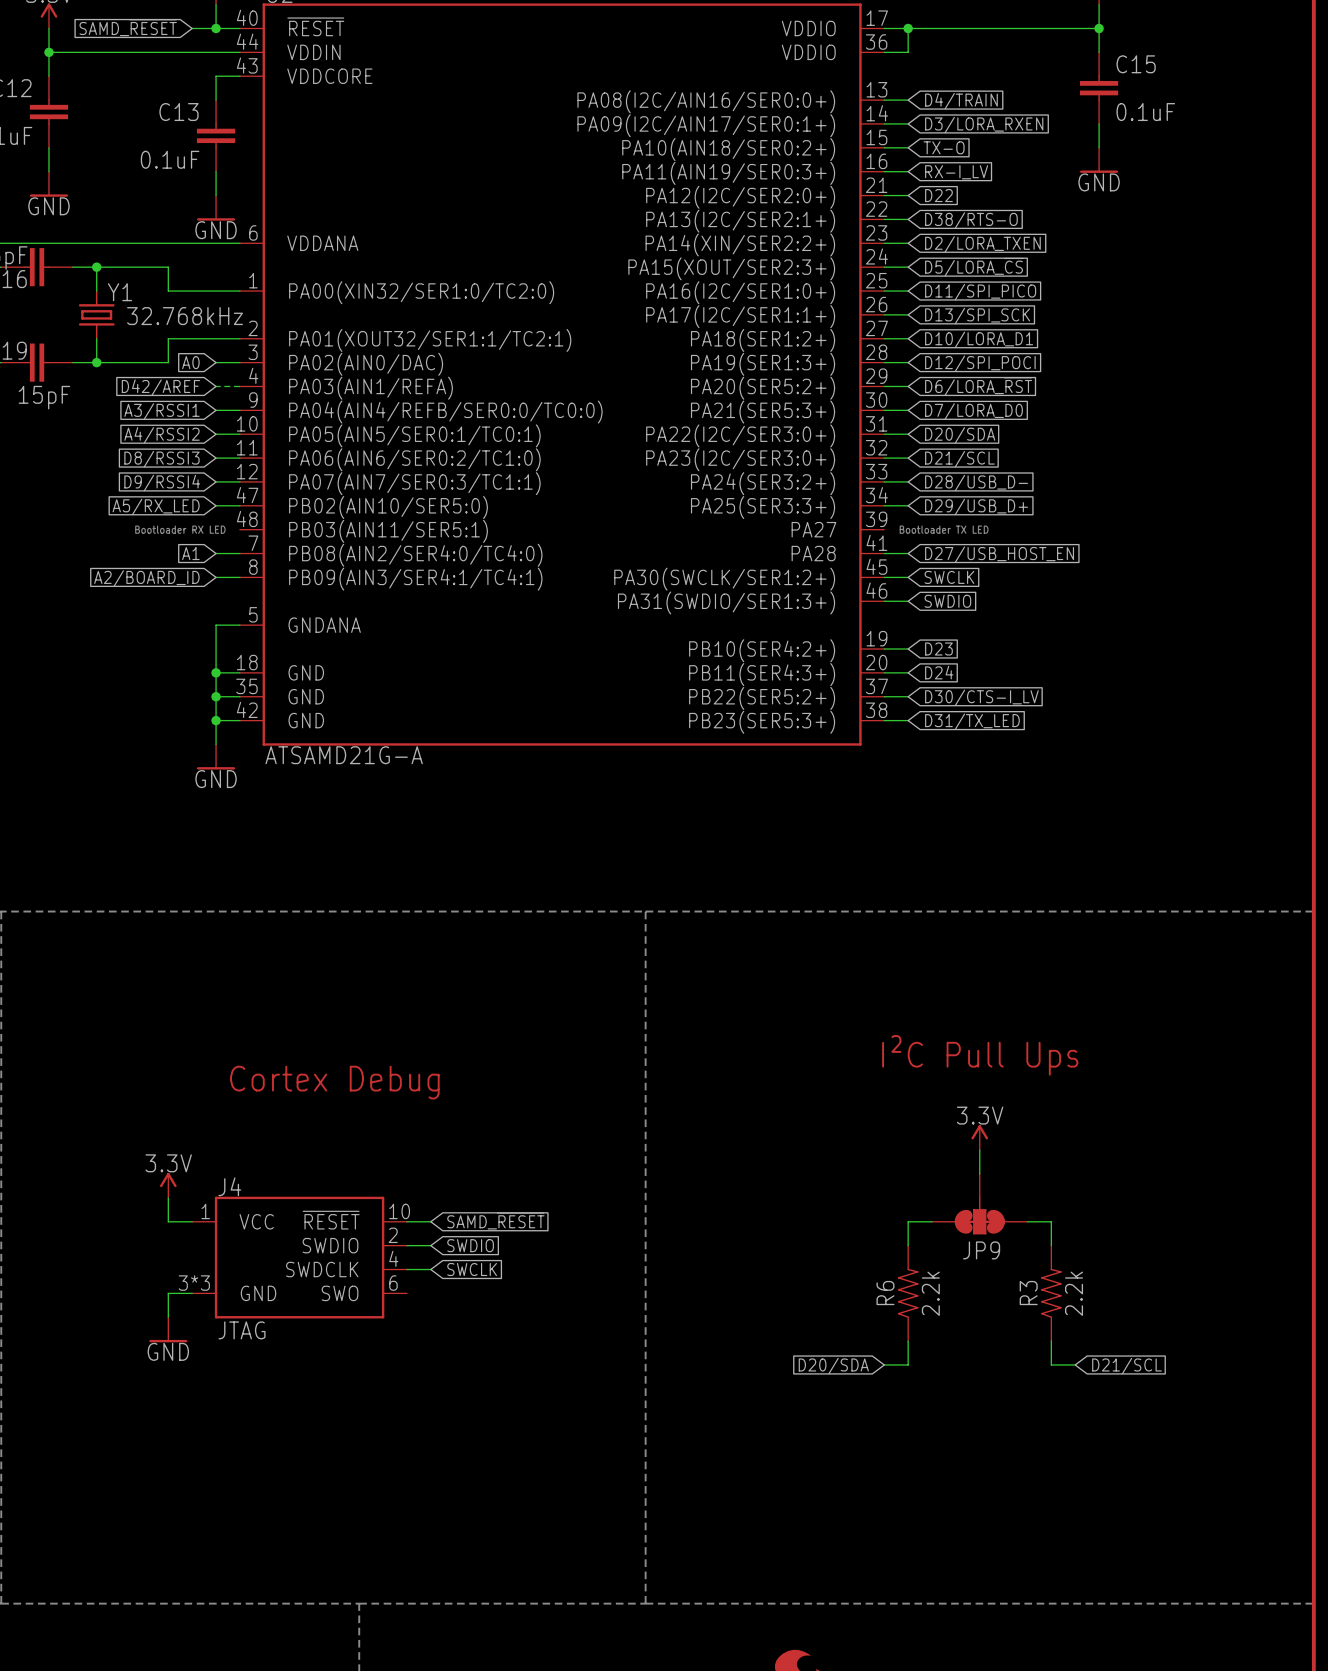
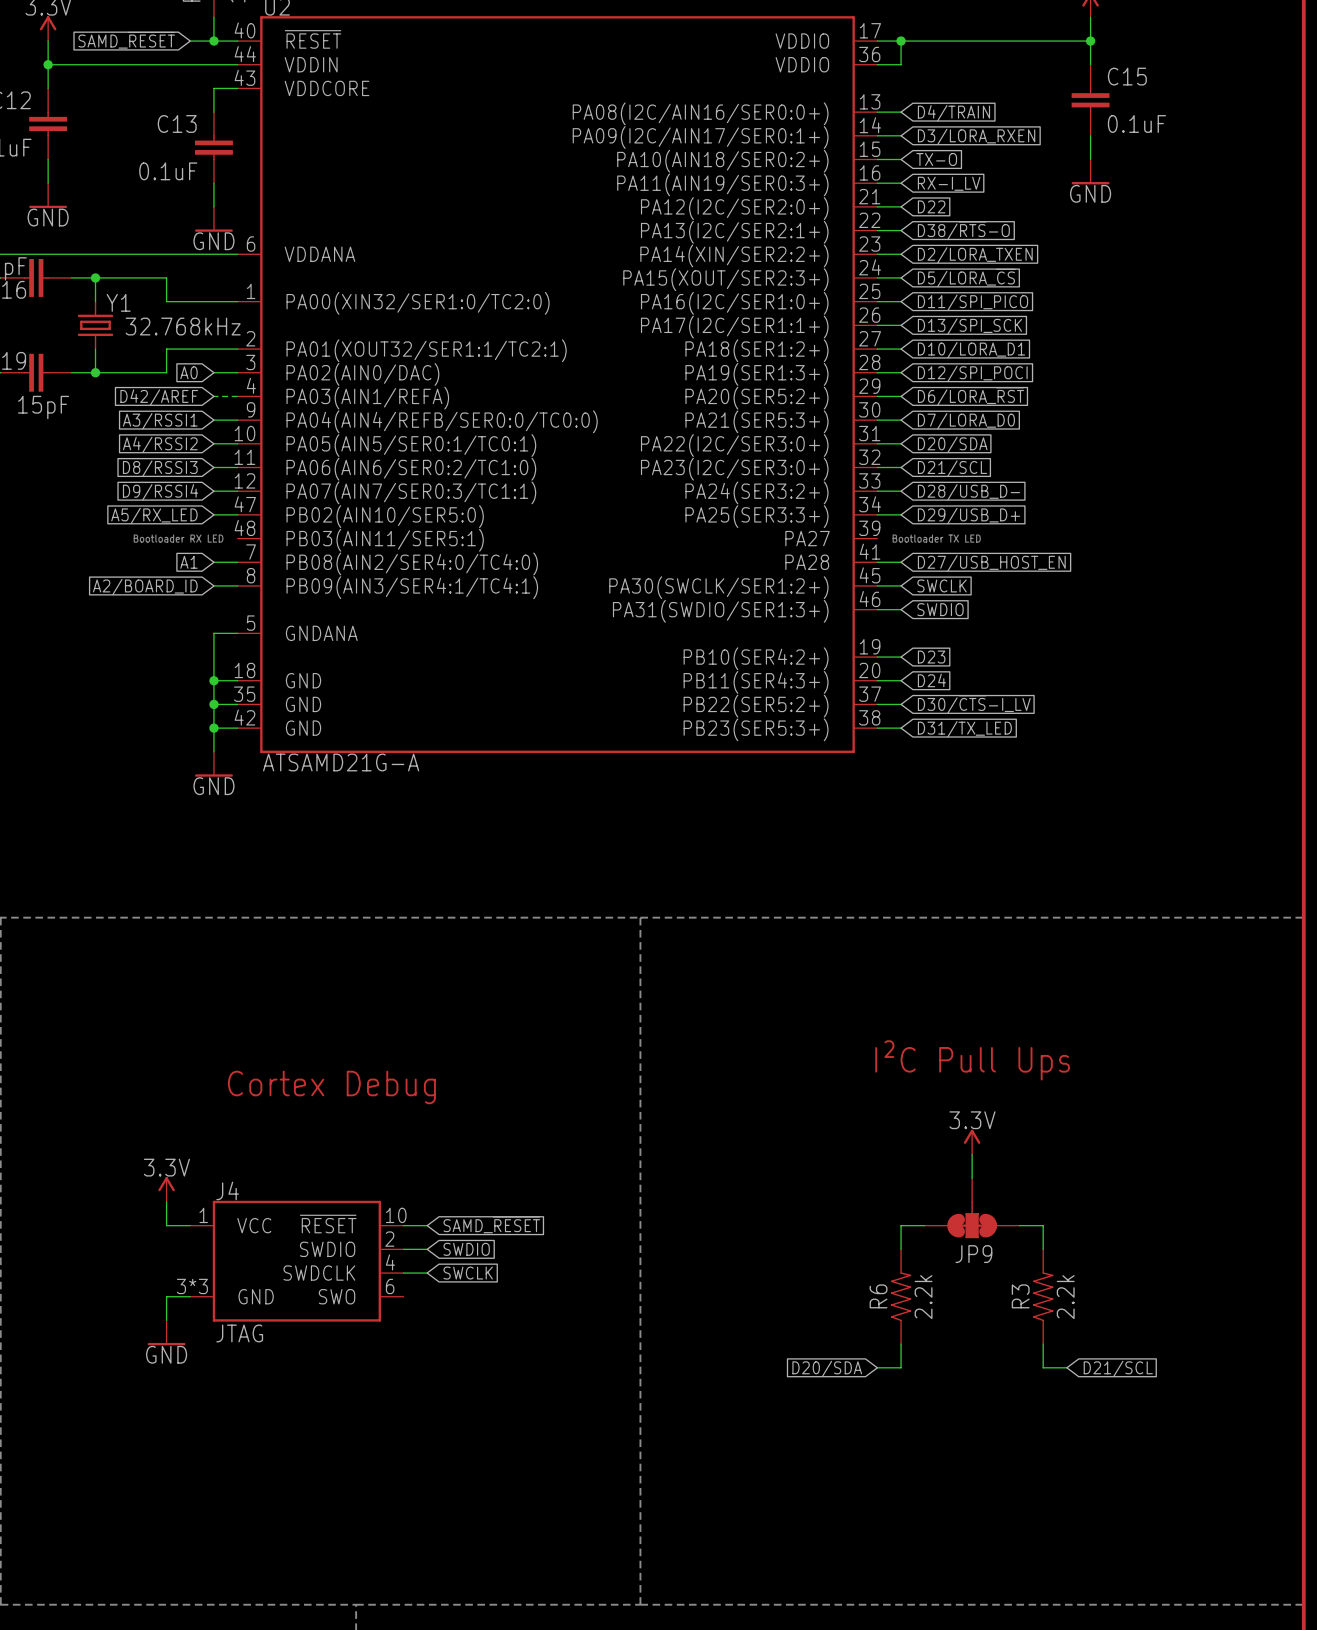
global label: D38/RTS-O (971, 220) -> D38/~{RTS}-O (963, 230)
global label: D30/CTS-I_LV (981, 697) -> D30/~{CTS}-I_LV (974, 704)

